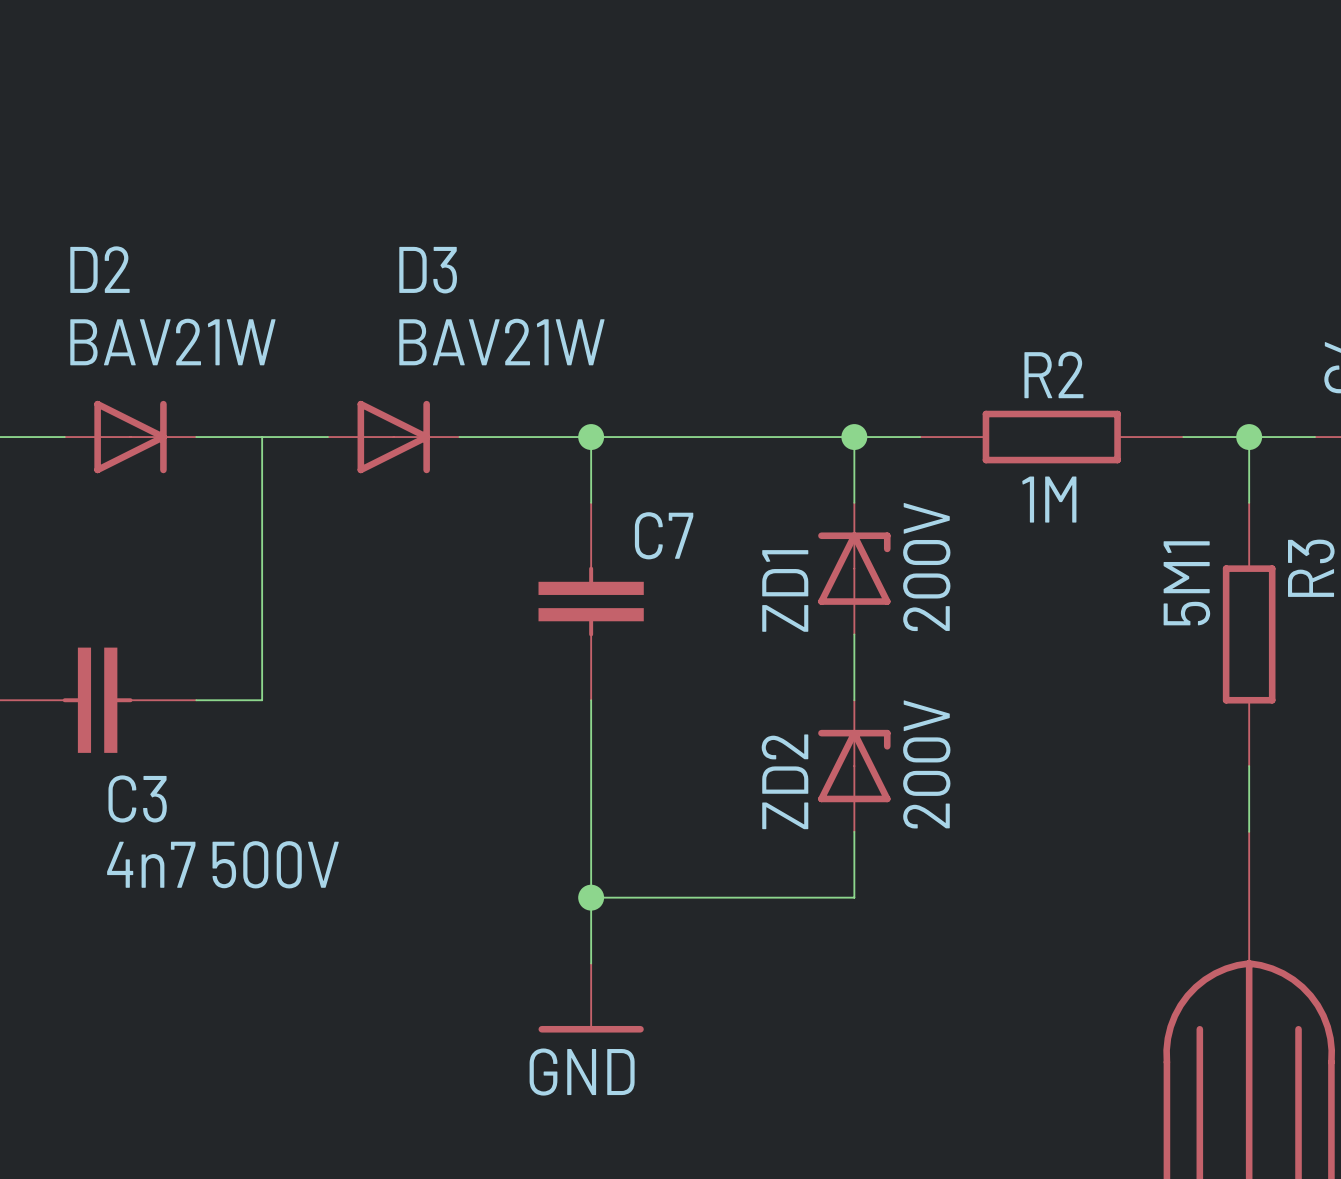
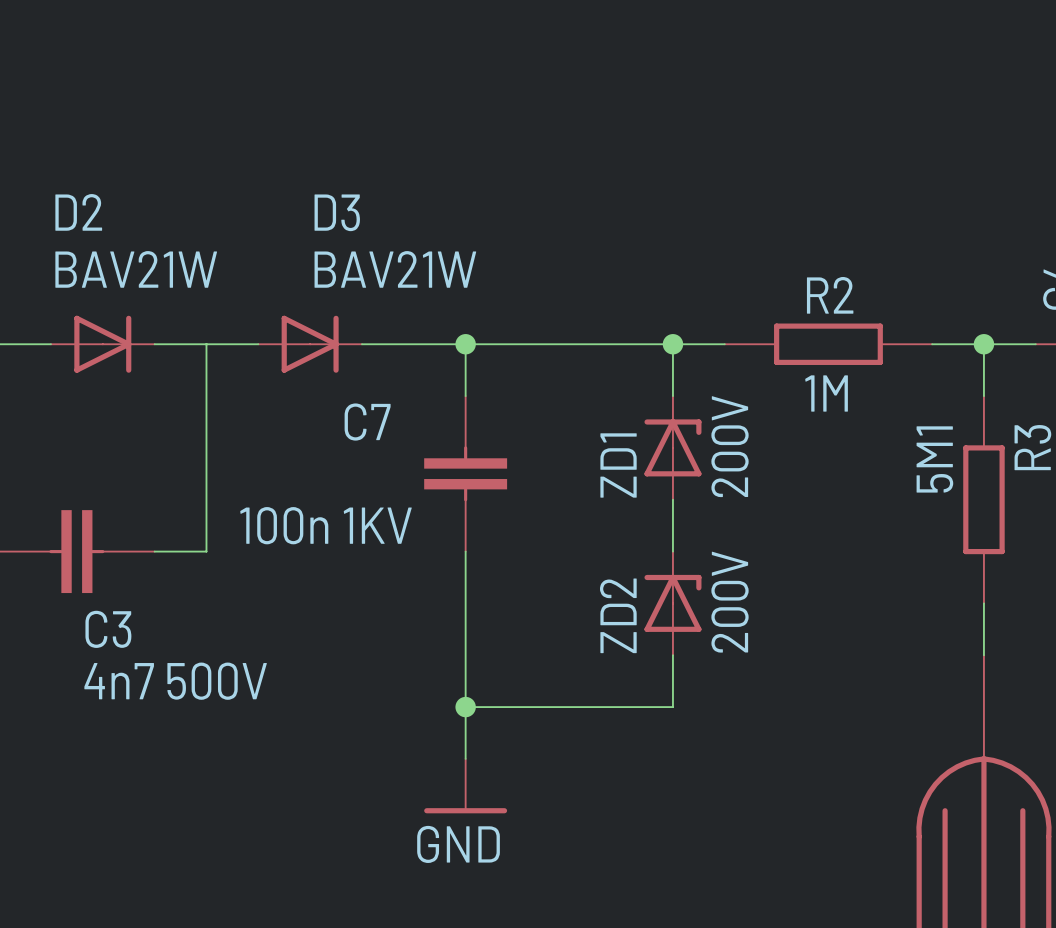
C7 name position: C7 (664, 535) -> C7 (367, 422)
C7 value: none -> 100n 1KV (326, 525)

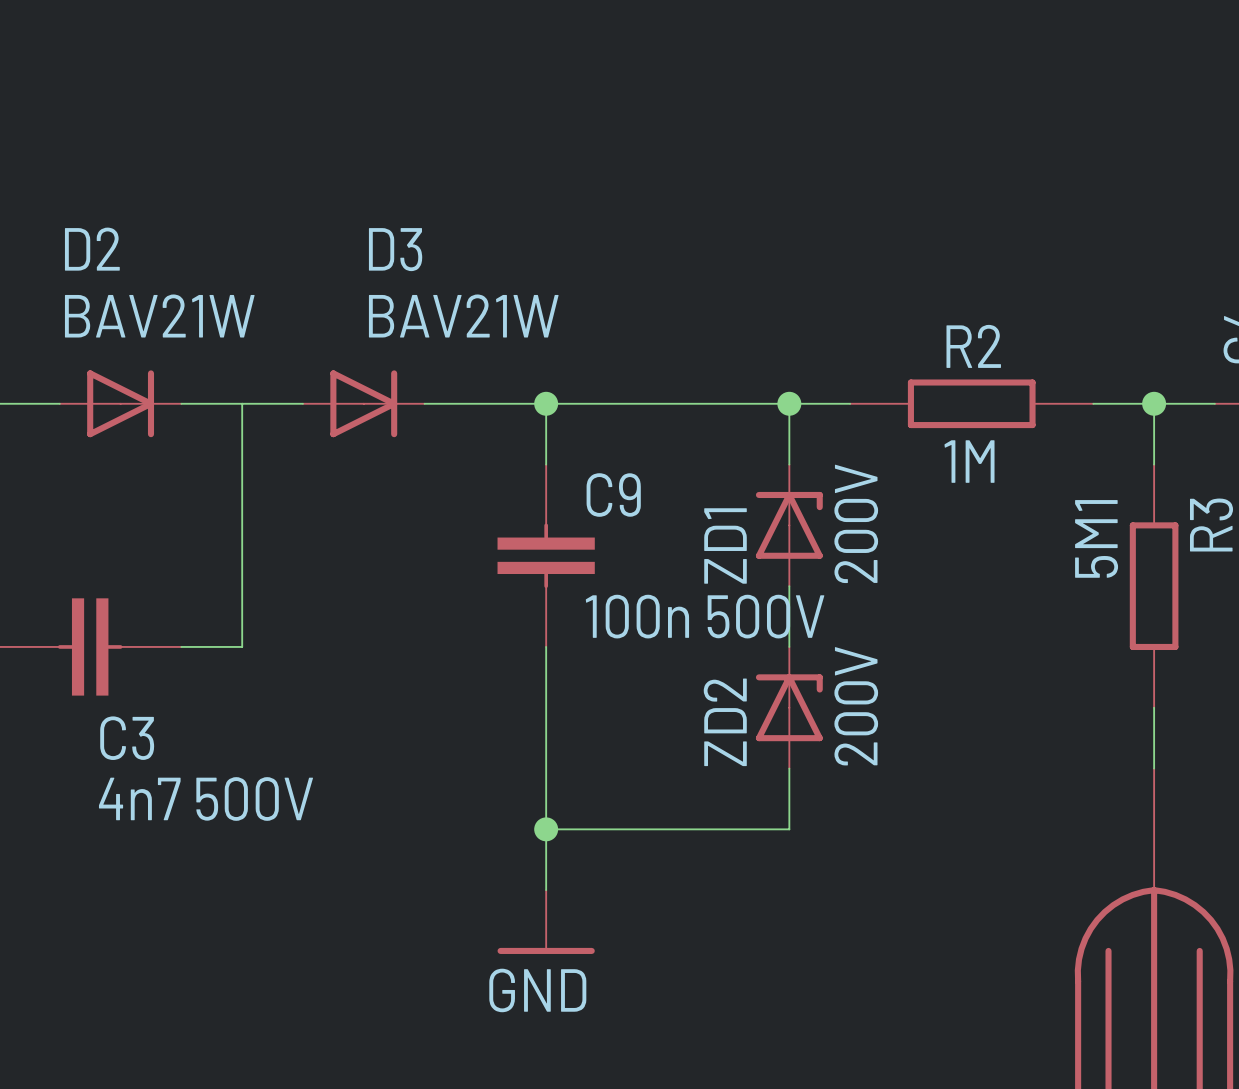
C7 name: C7 (367, 422) -> C9 (613, 495)
C7 value: 100n 1KV (326, 525) -> 100n 500V (705, 616)

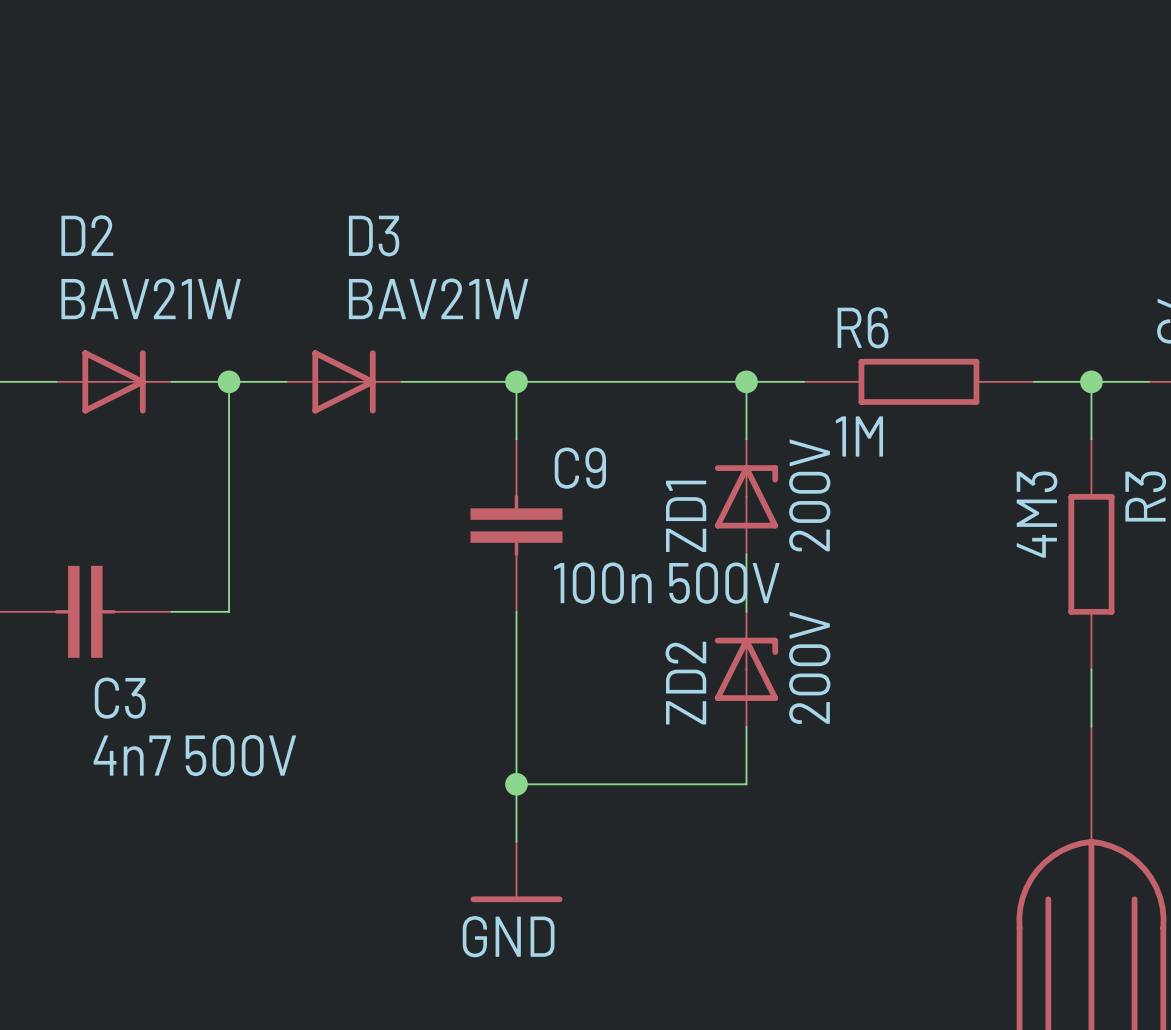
R2 name: R2 (973, 346) -> R6 (863, 327)
junction: none -> (229, 381)
R2 value position: 1M (969, 461) -> 1M (859, 436)
R3 value: 5M1 (1096, 538) -> 4M3 (1037, 514)

